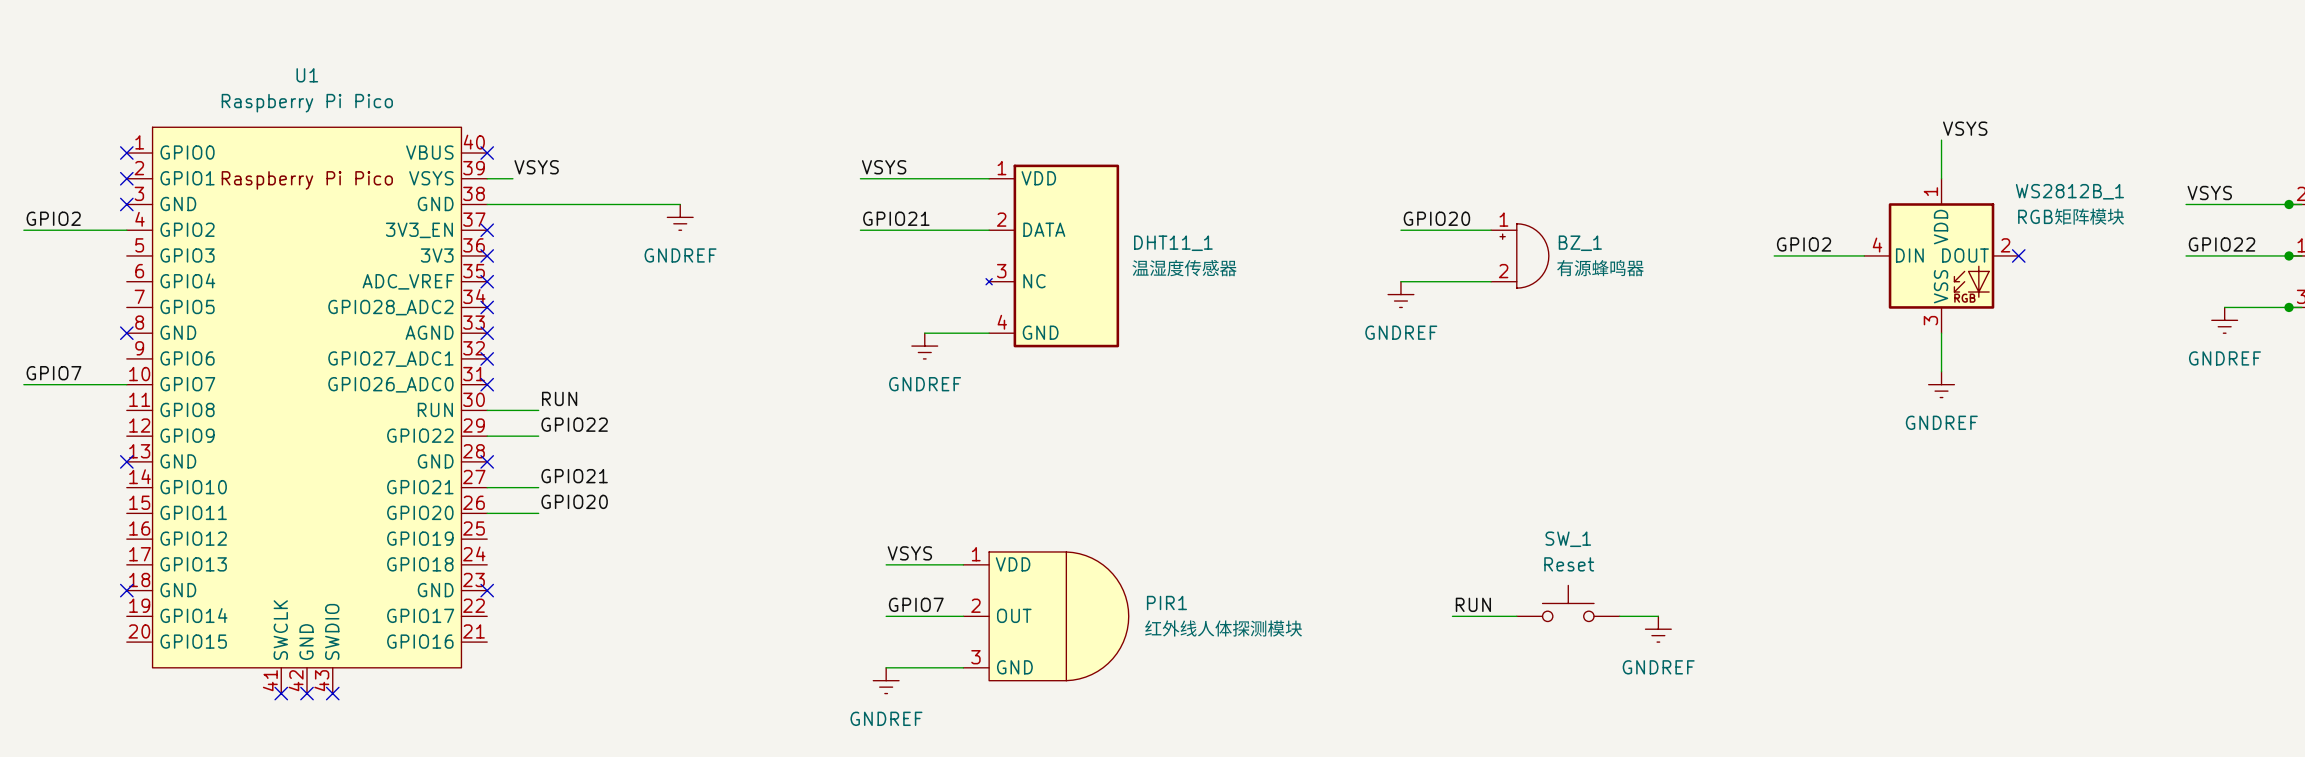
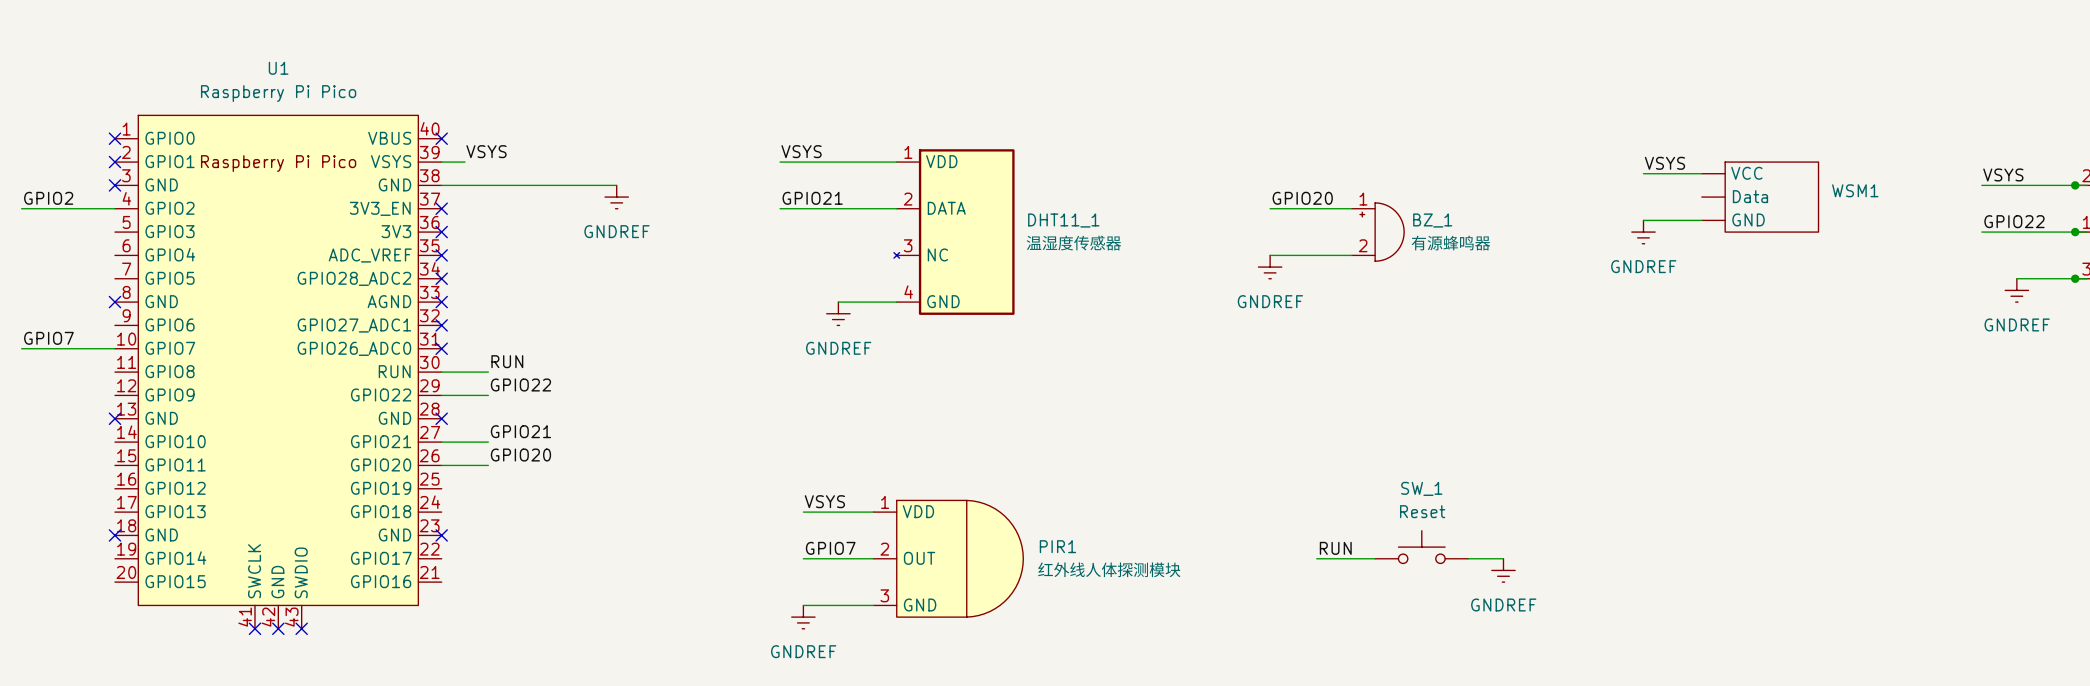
label position: VSYS (1965, 128) -> VSYS (1664, 163)
wire: (1941, 140) (1941, 178) -> none
wire: none -> (1643, 173) (1701, 173)
WSM1: none -> (1760, 197)
wire: none -> (1643, 220) (1701, 220)
label: GPIO2 (1804, 244) -> none
wire: (1774, 255) (1864, 255) -> none
WS2812B_1: RGB矩阵模块 (1941, 255) -> none
no-connect mark: (2018, 255) -> none
wire: (1941, 333) (1941, 371) -> none
power symbol position: GNDREF (1941, 384) -> GNDREF (1643, 232)

